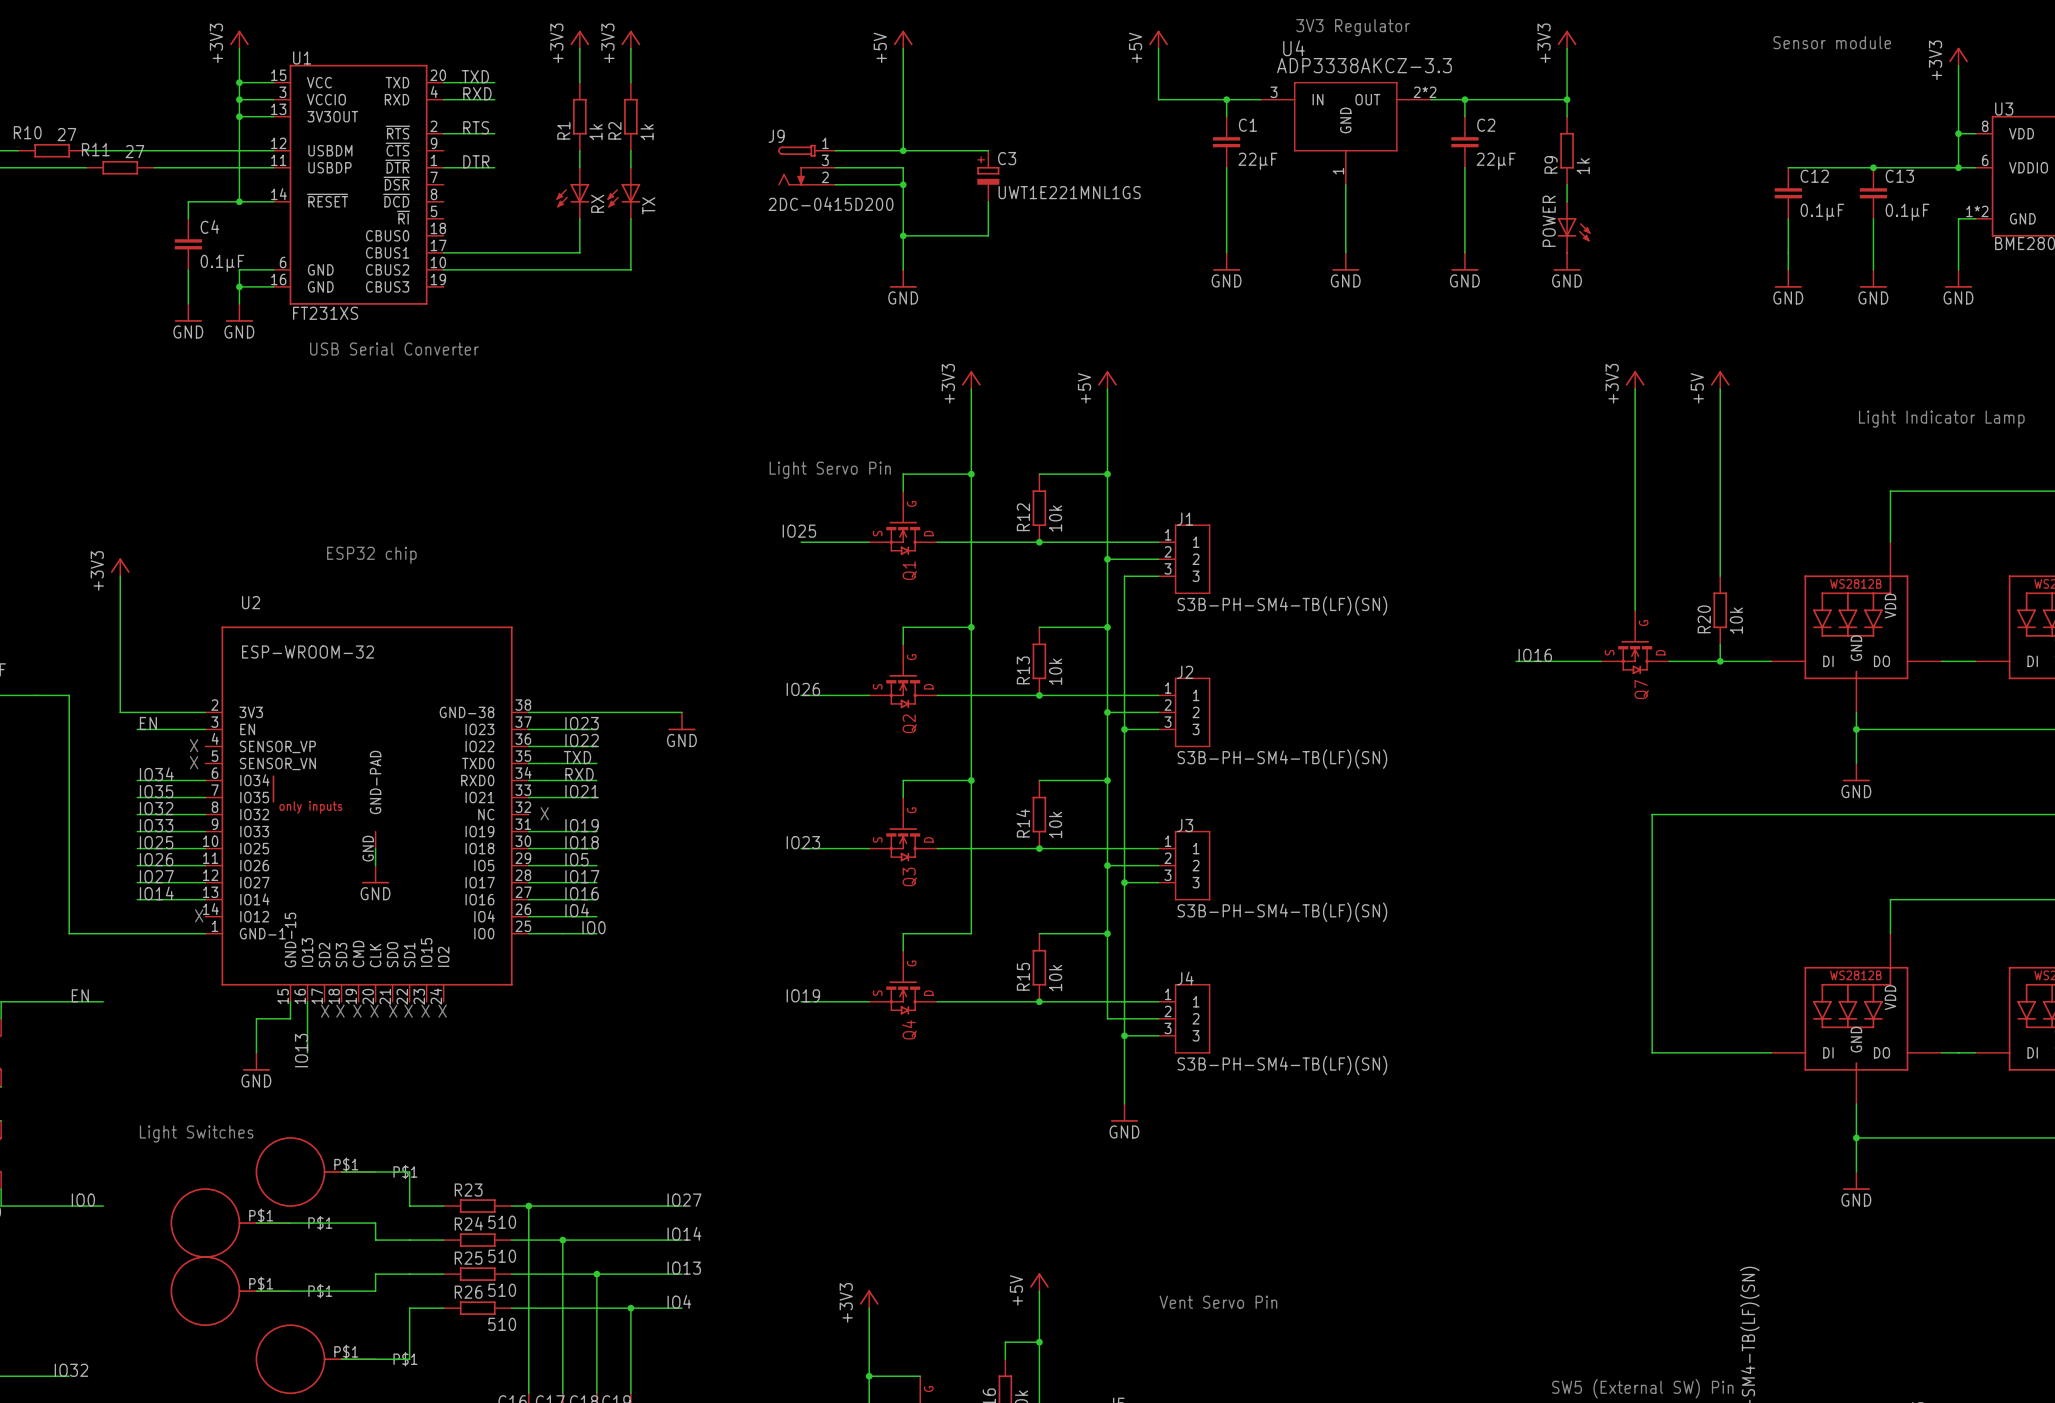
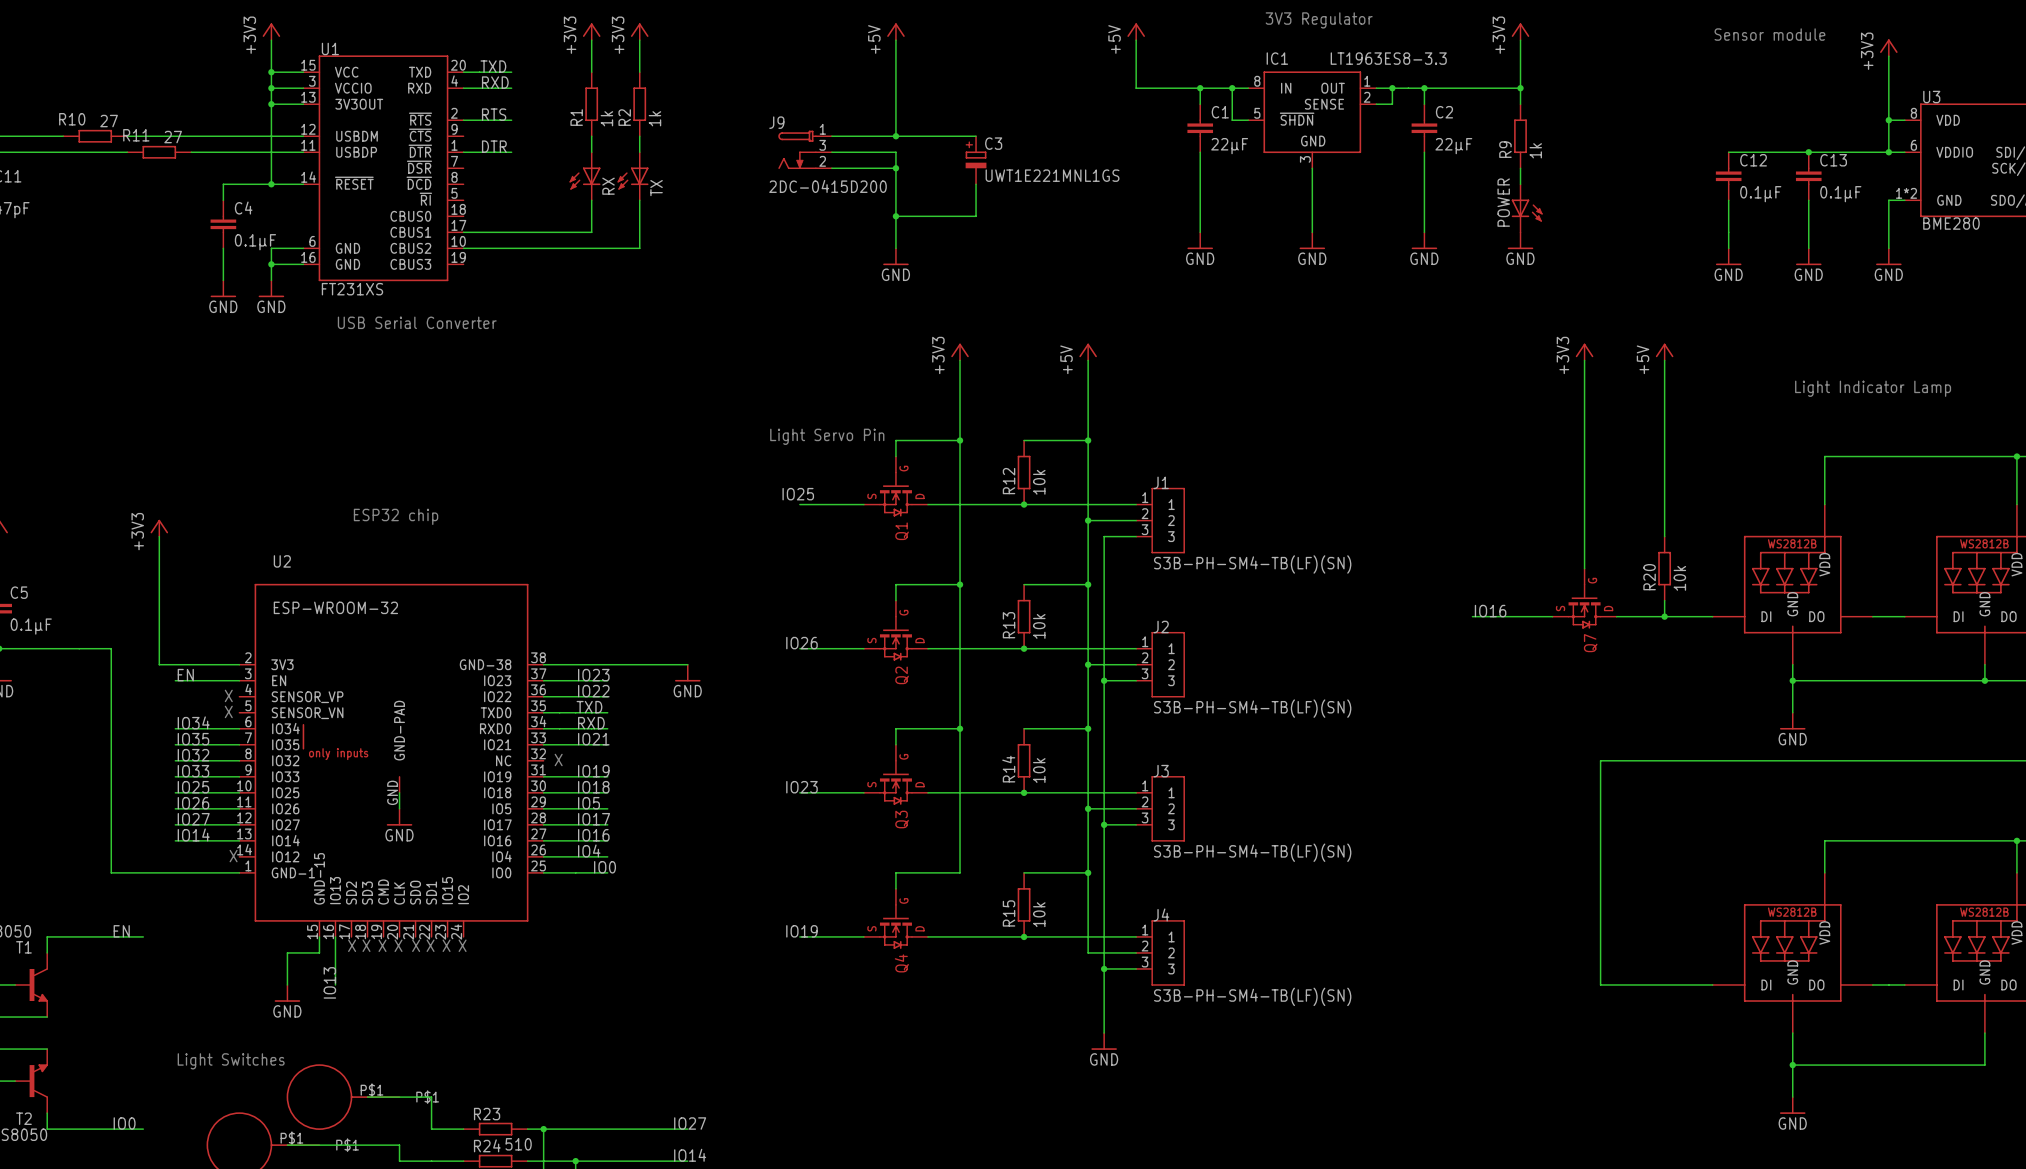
junction: none -> (1232, 88)
wire: none -> (1248, 88) (1232, 88) (1232, 120) (1248, 120)
wire: none -> (1376, 88) (1392, 88) (1392, 104) (1376, 104)
junction: none -> (1392, 88)
U4: ADP3338AKCZ-3.3 (1345, 133) -> none
IC1: none -> LT1963ES8-3.3 (1312, 119)

